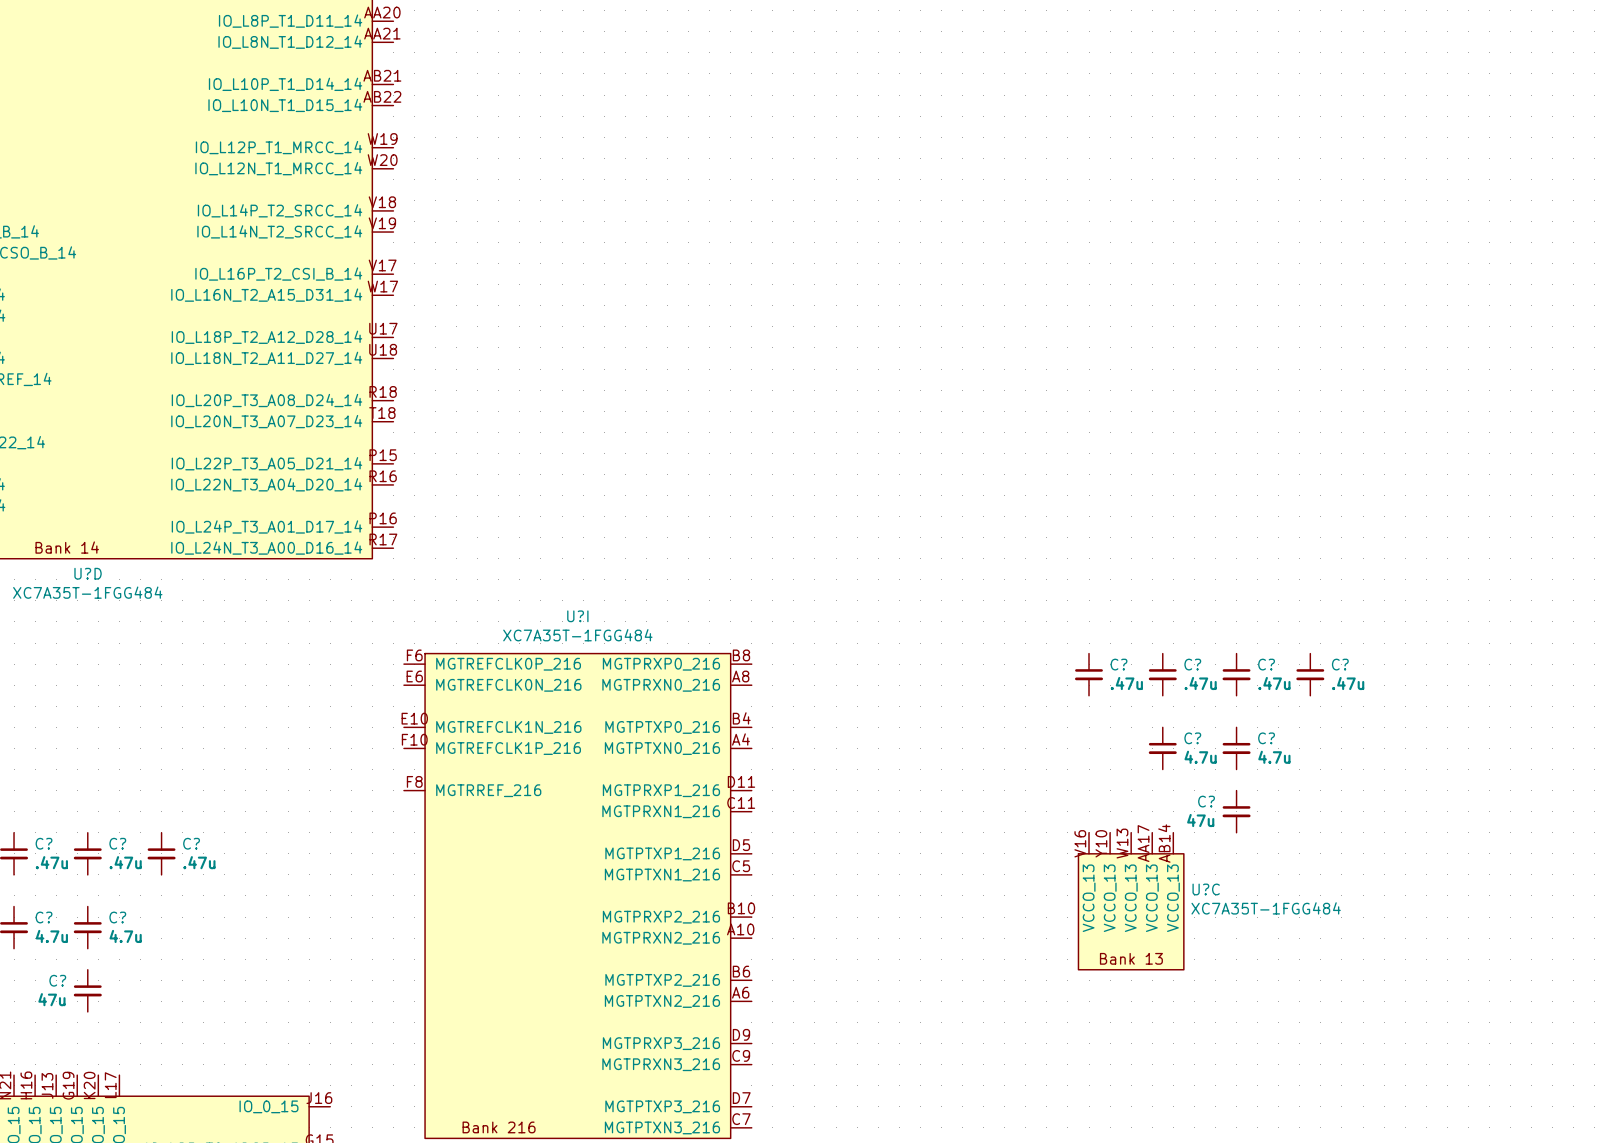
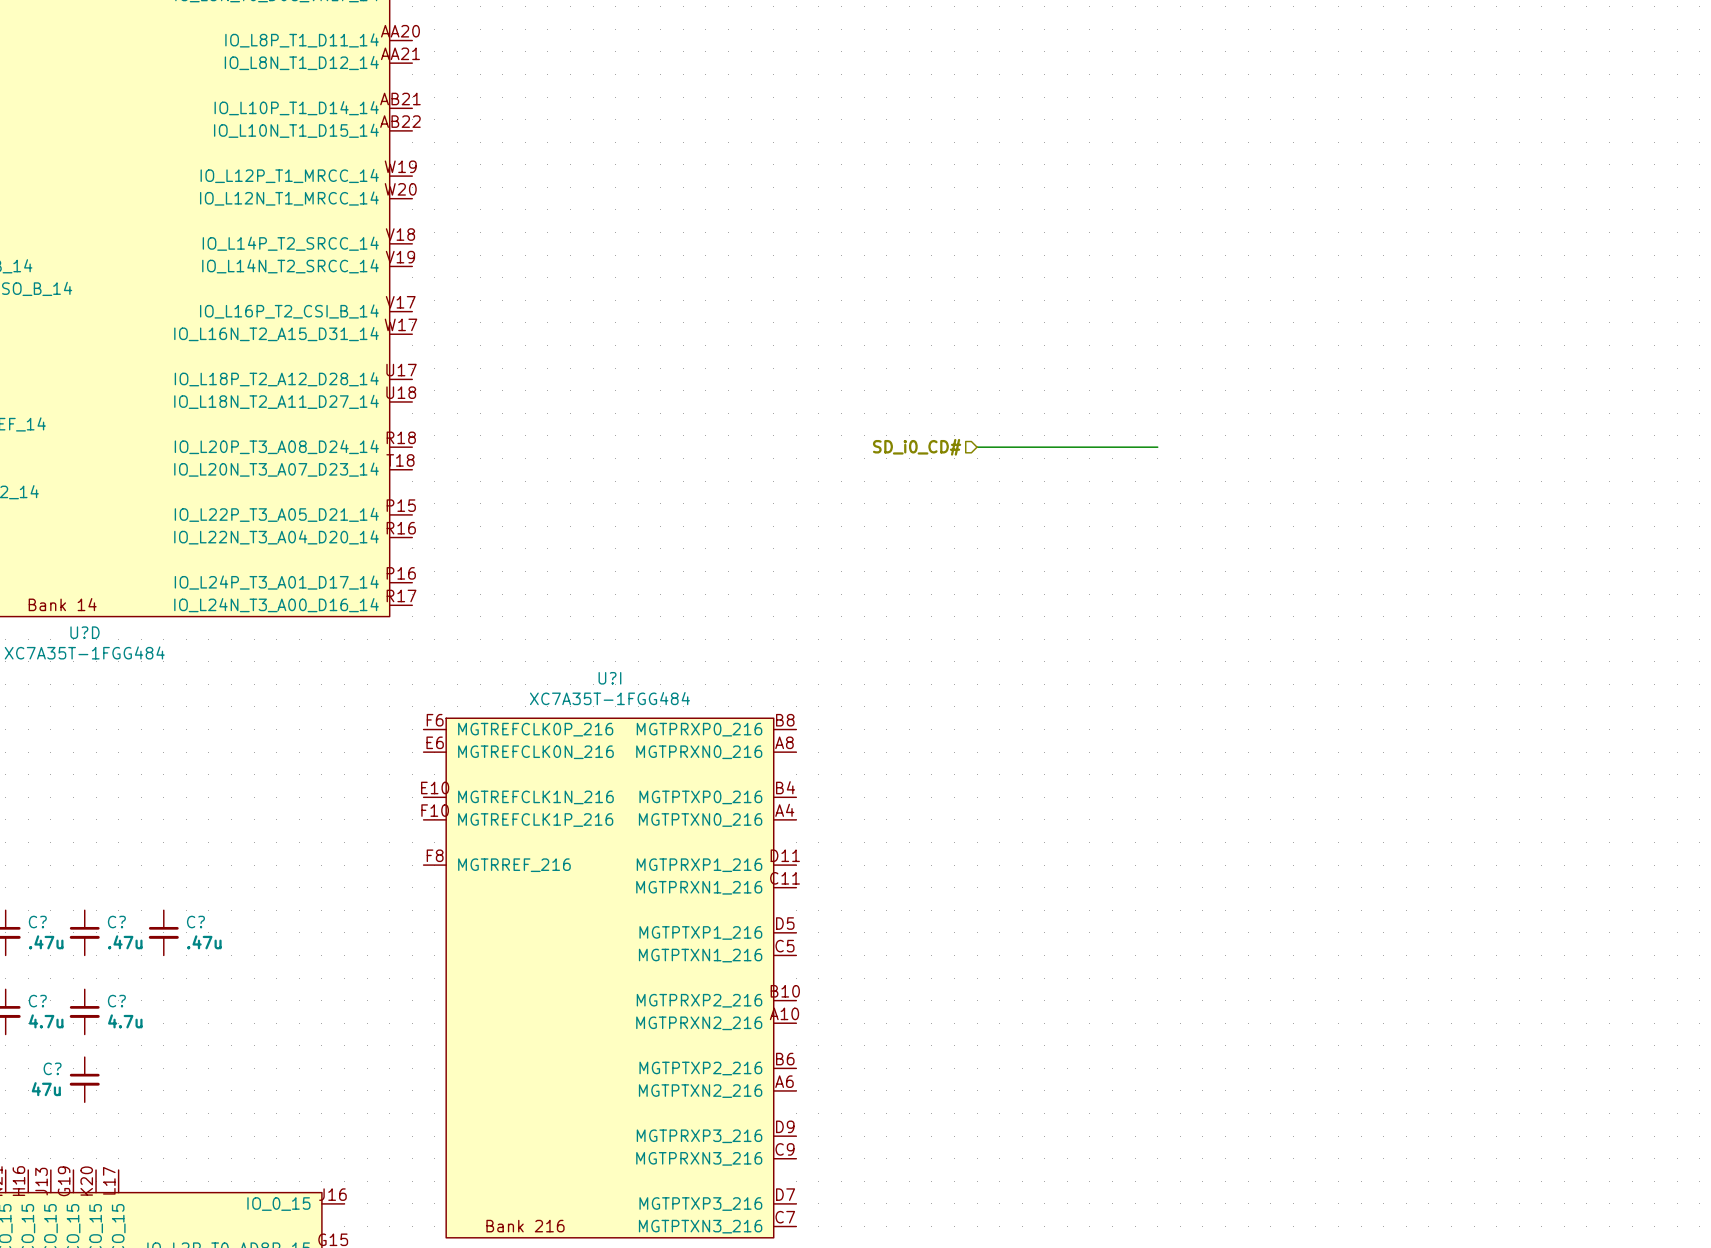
hierarchical label: none -> SD_i0_CD# (917, 447)
wire: none -> (977, 447) (1157, 447)
C?: .47u (1089, 674) -> none
C?: .47u (1162, 674) -> none
C?: .47u (1236, 674) -> none
C?: .47u (1310, 674) -> none
C?: 4.7u (1162, 748) -> none
C?: 4.7u (1236, 748) -> none
C?: 47u (1236, 811) -> none
U?C: XC7A35T-1FGG484 (1131, 901) -> none

